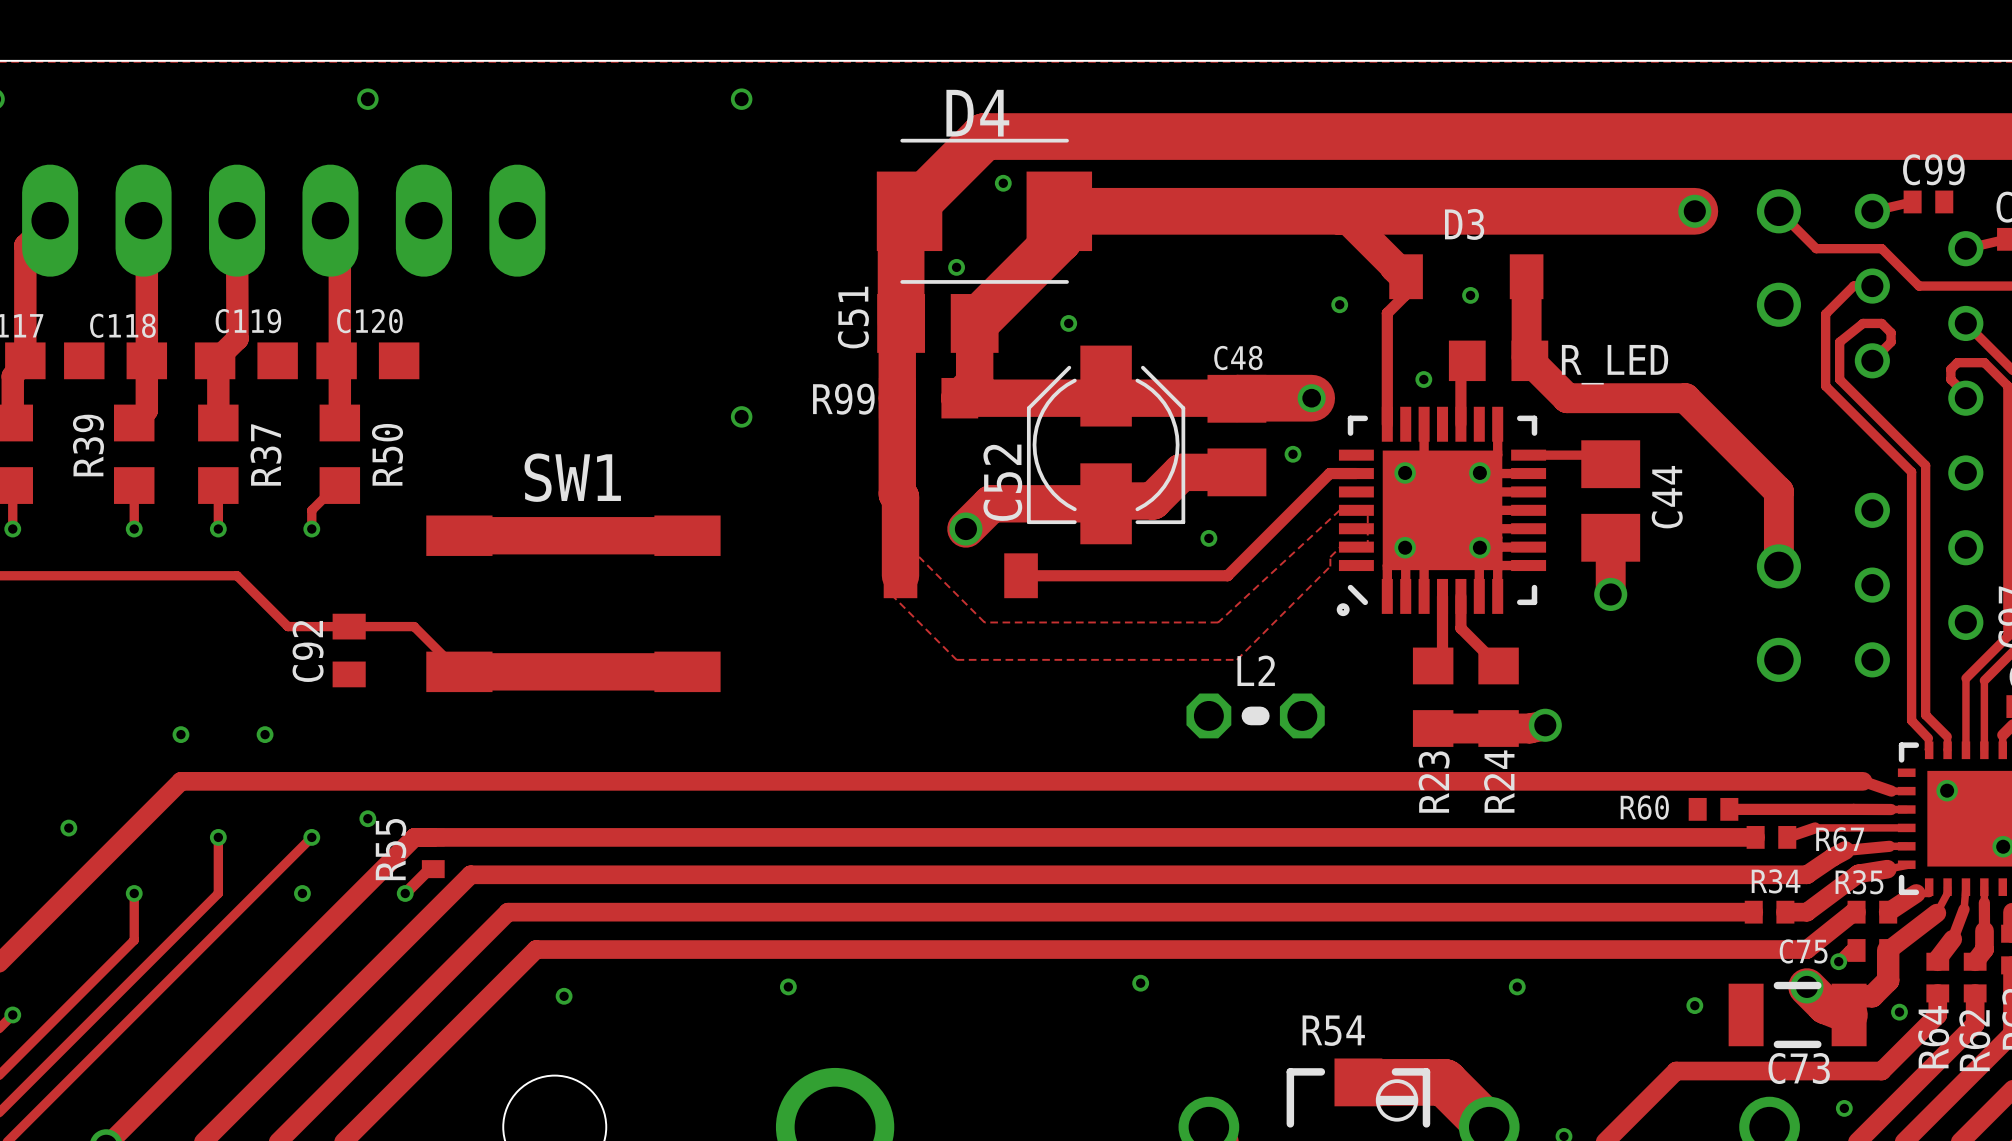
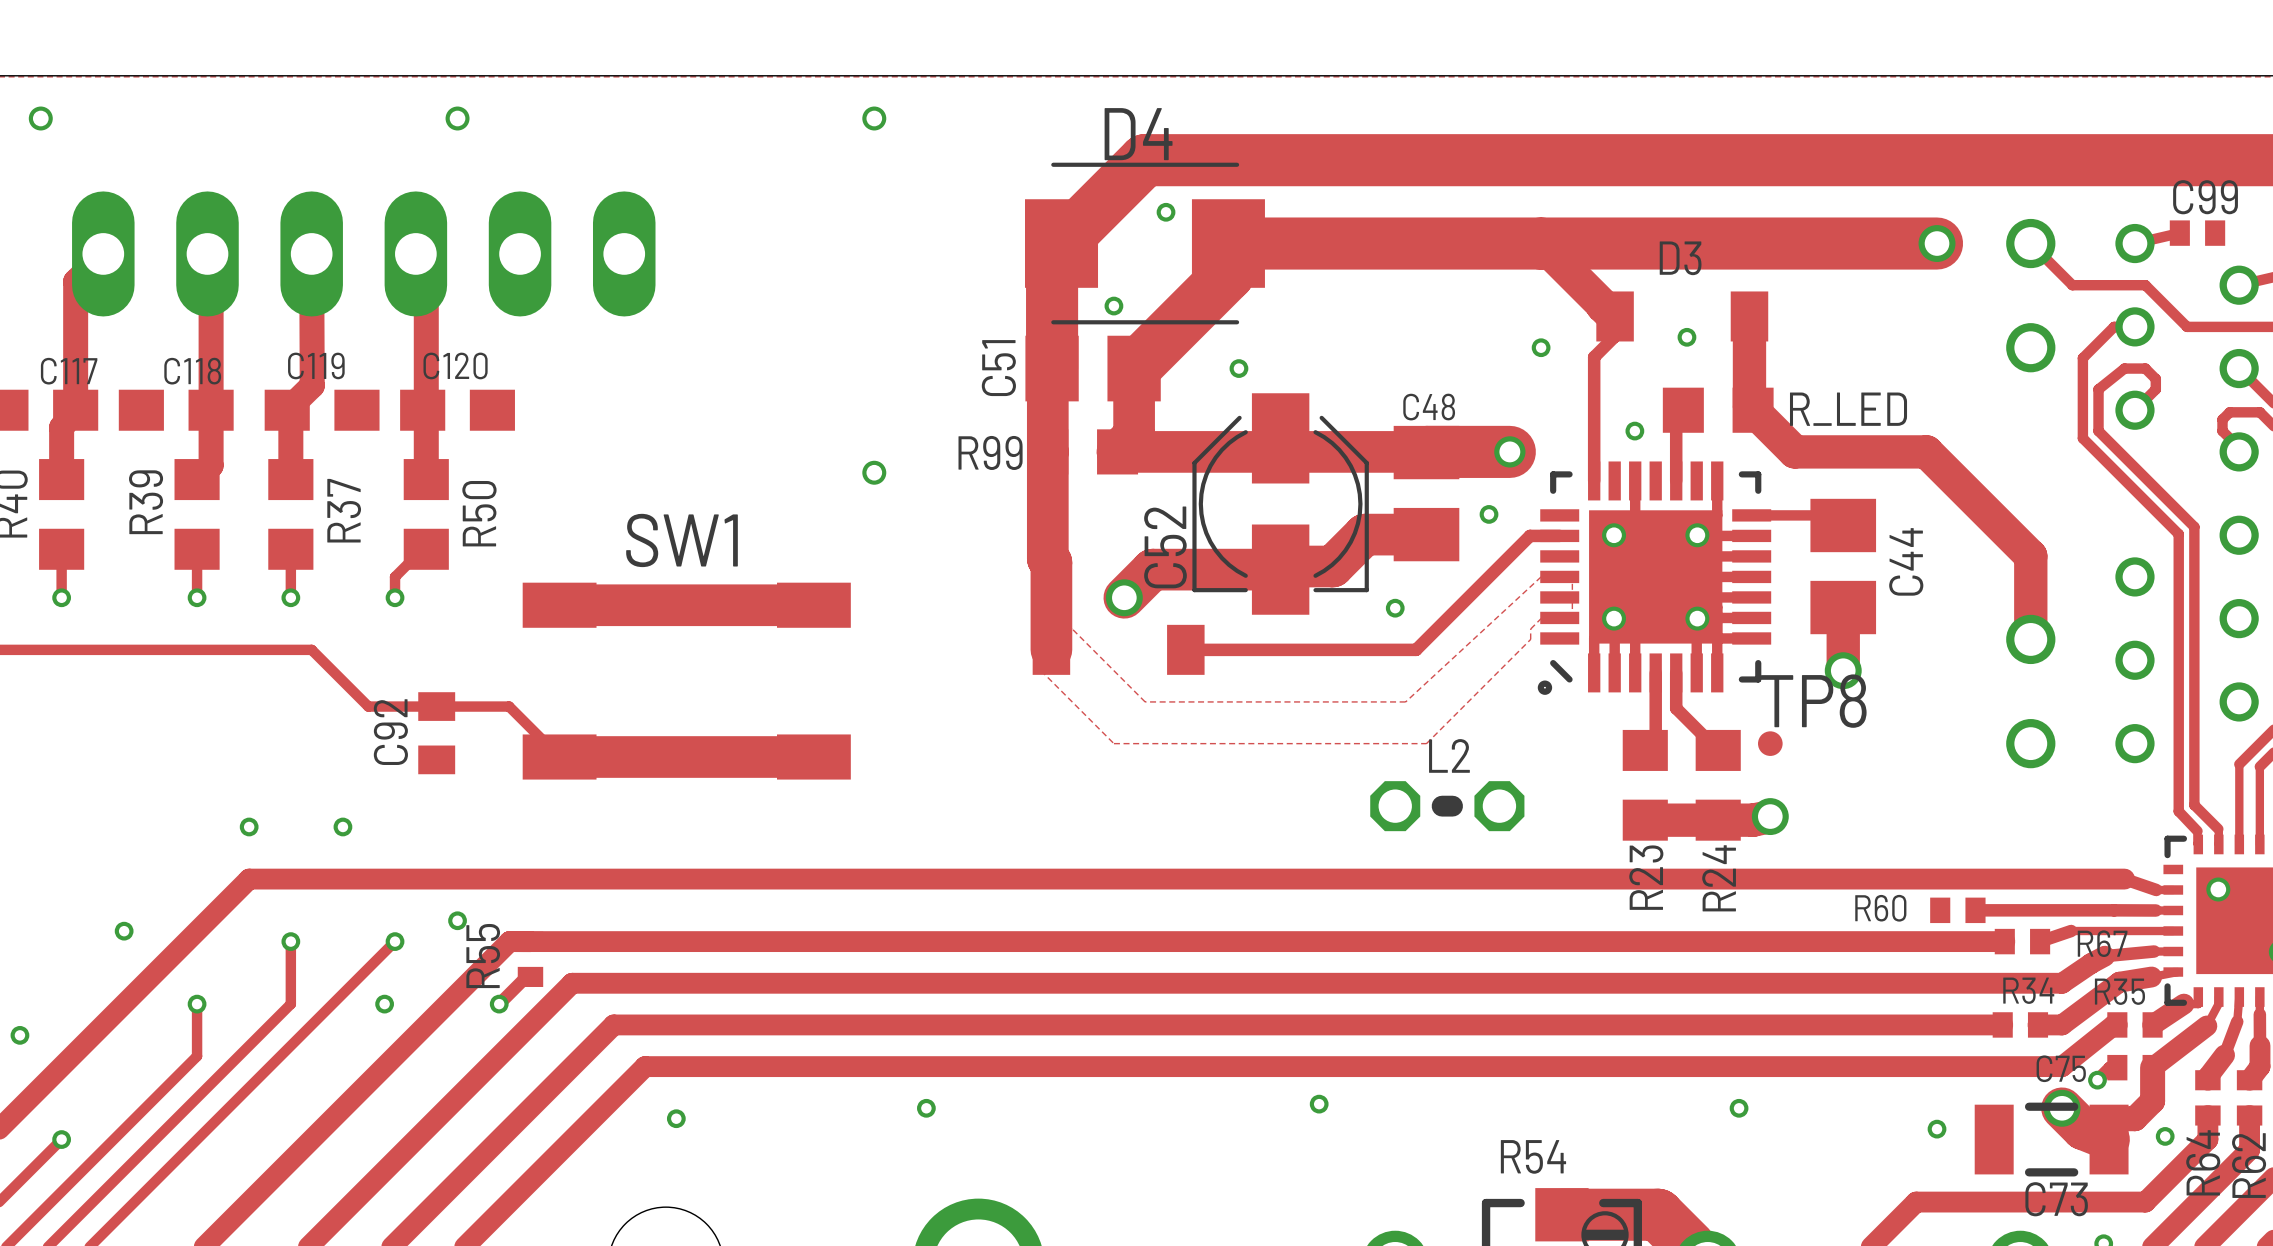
TP8: none -> (1770, 743)

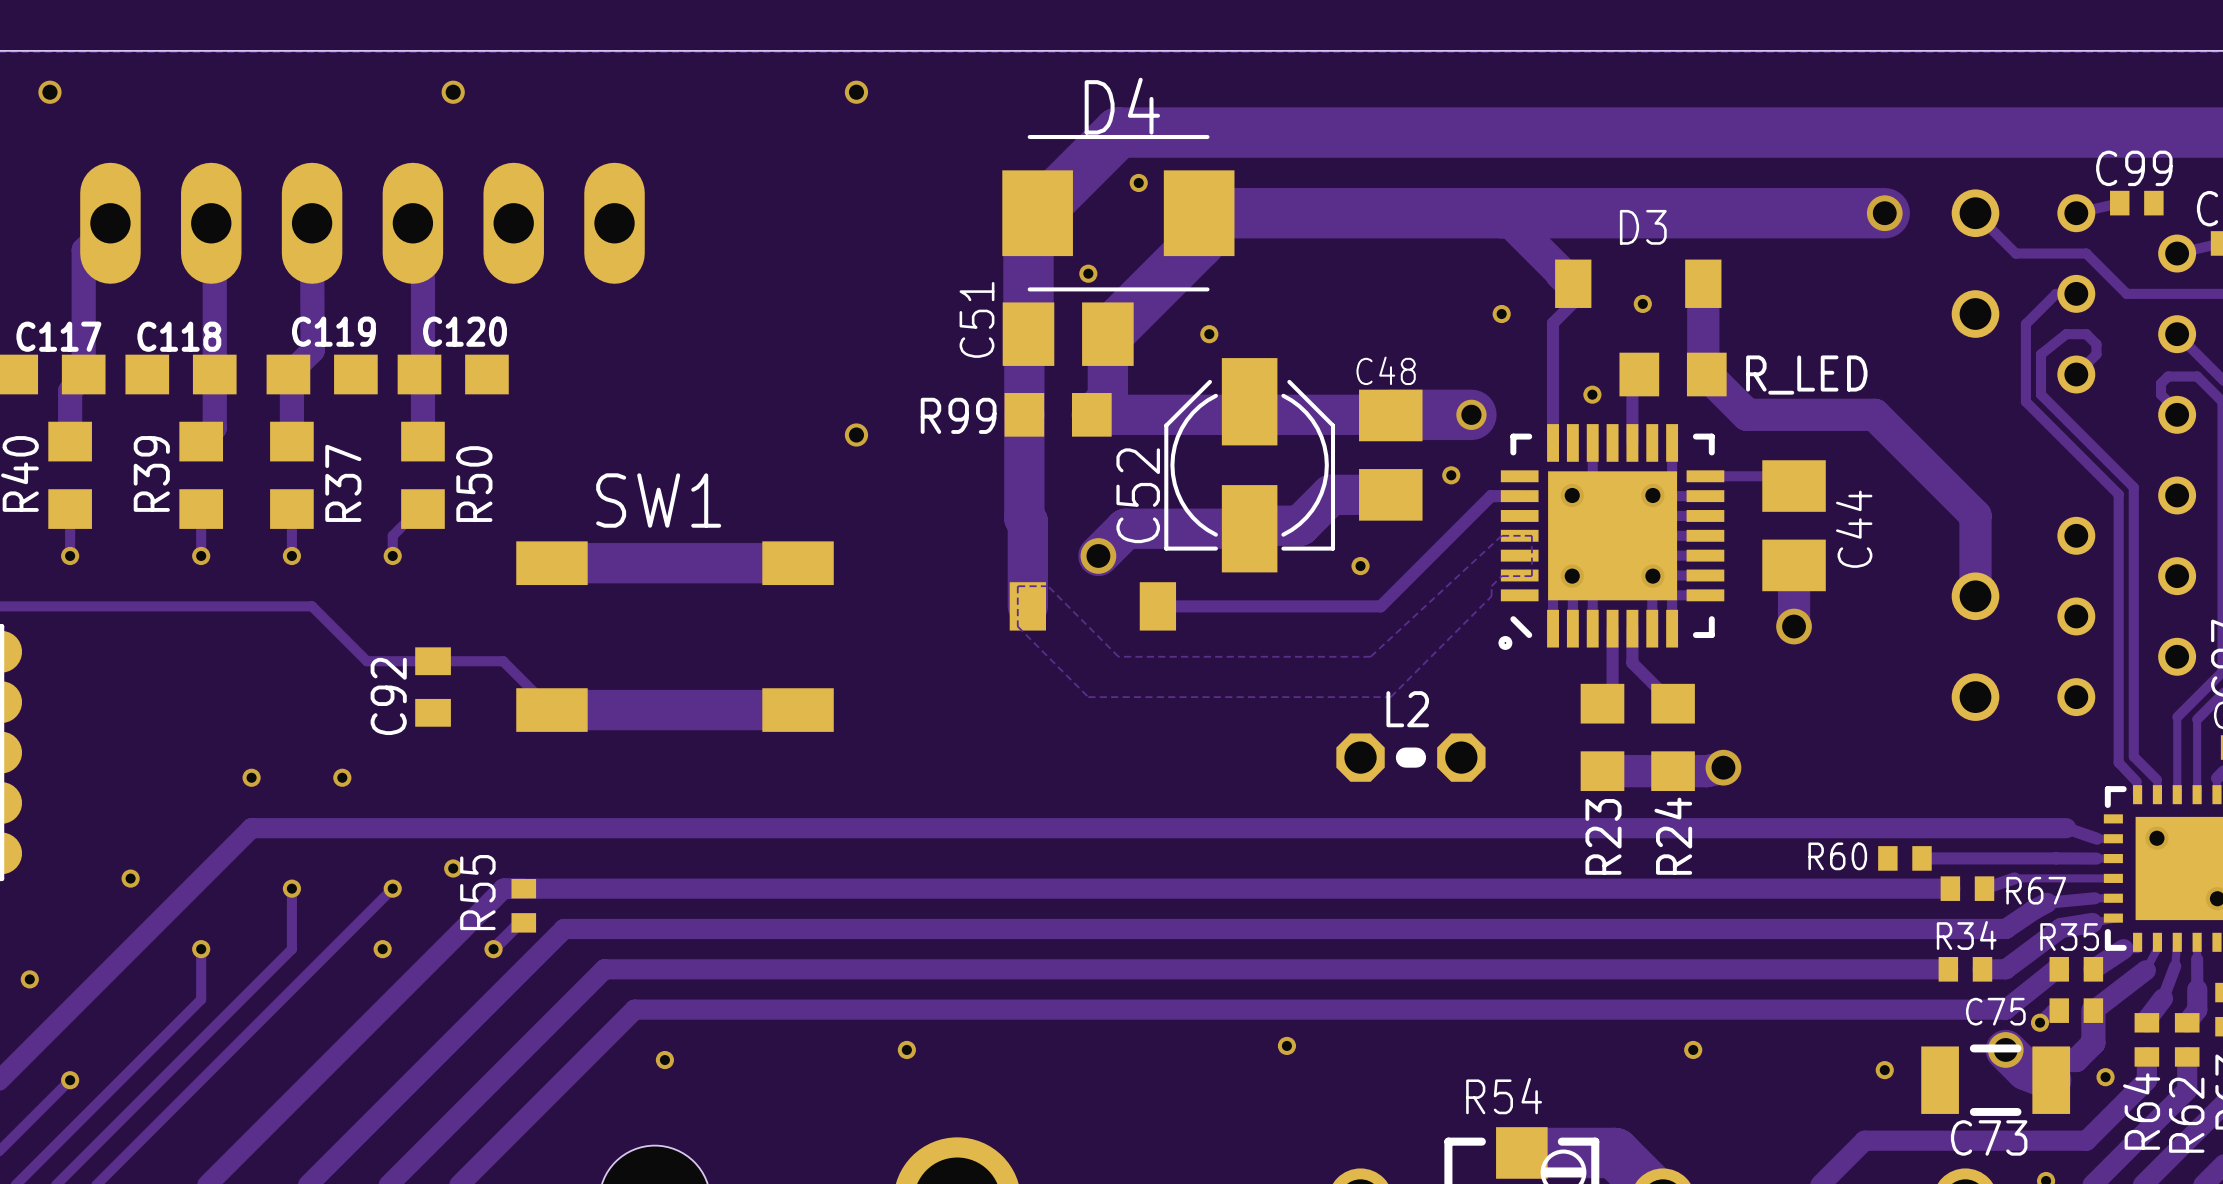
TP8: (1770, 743) -> none

